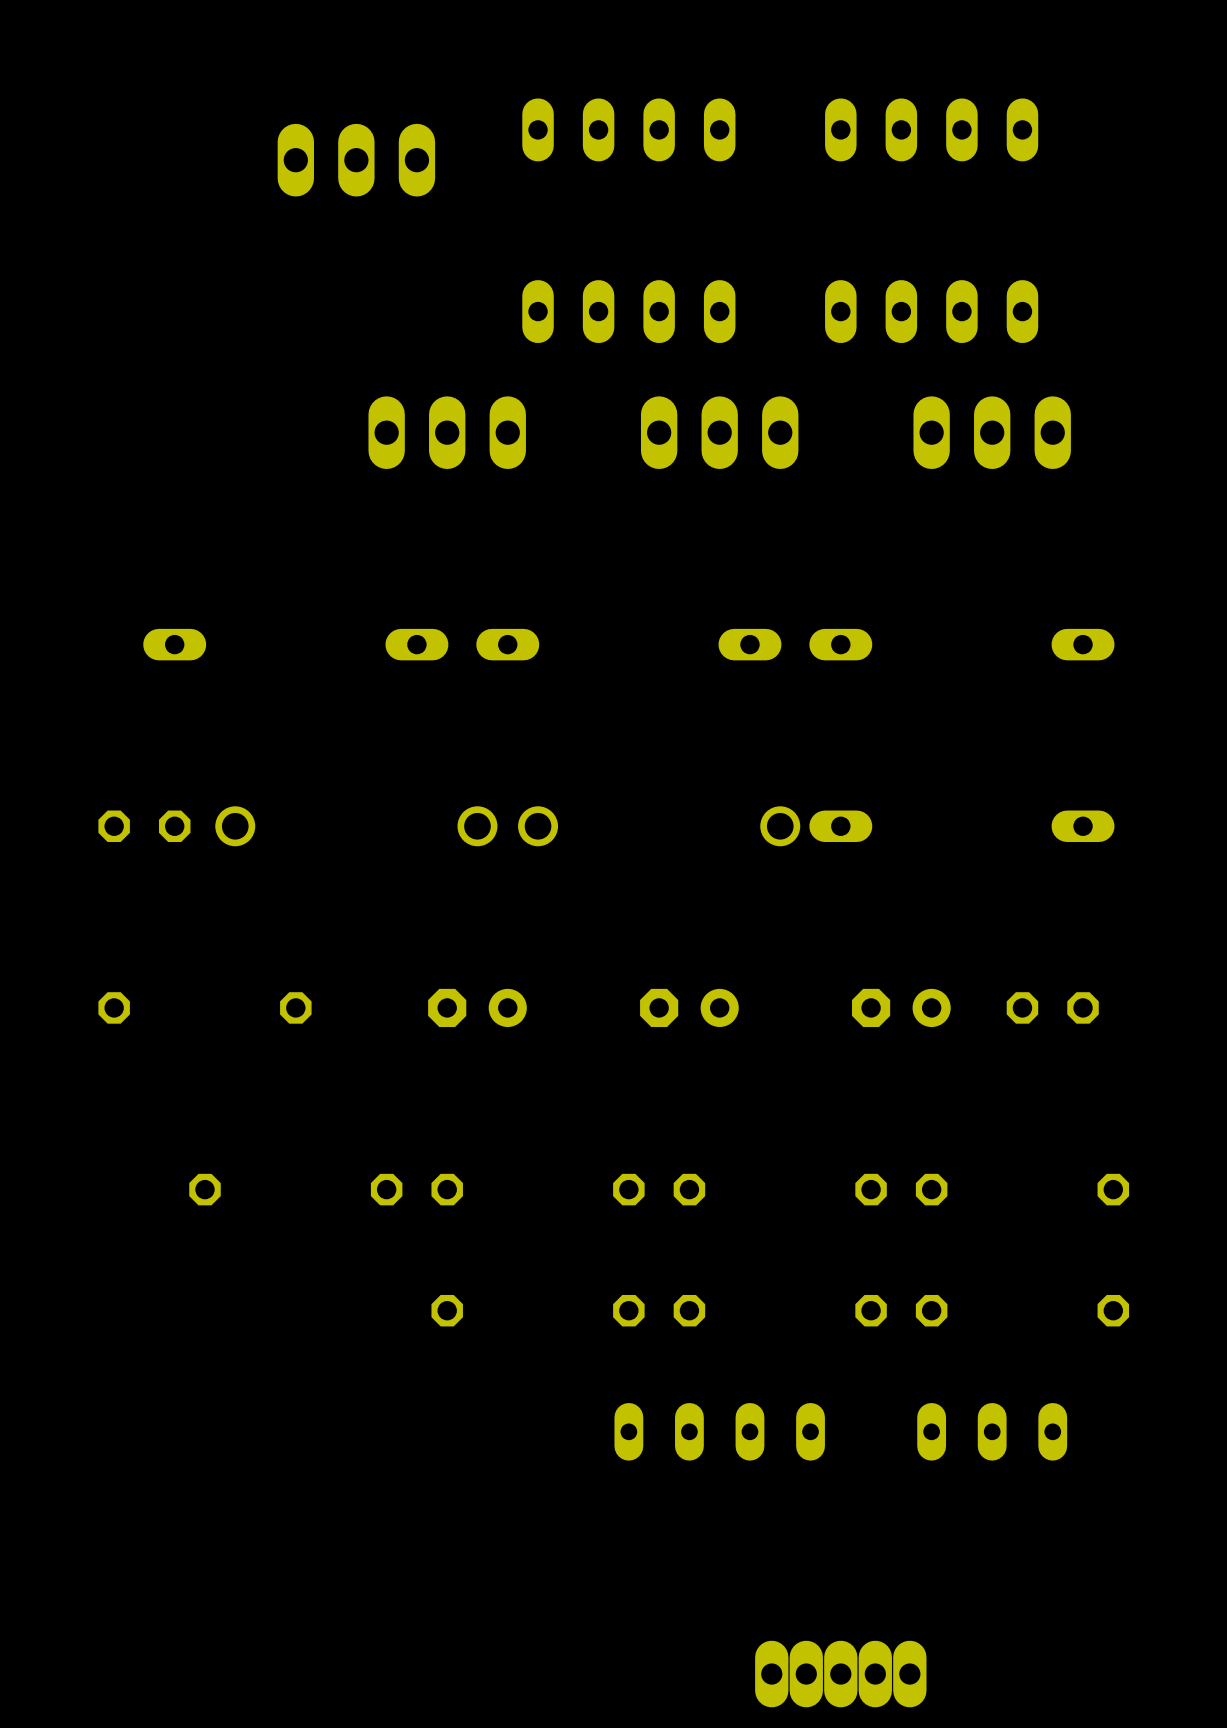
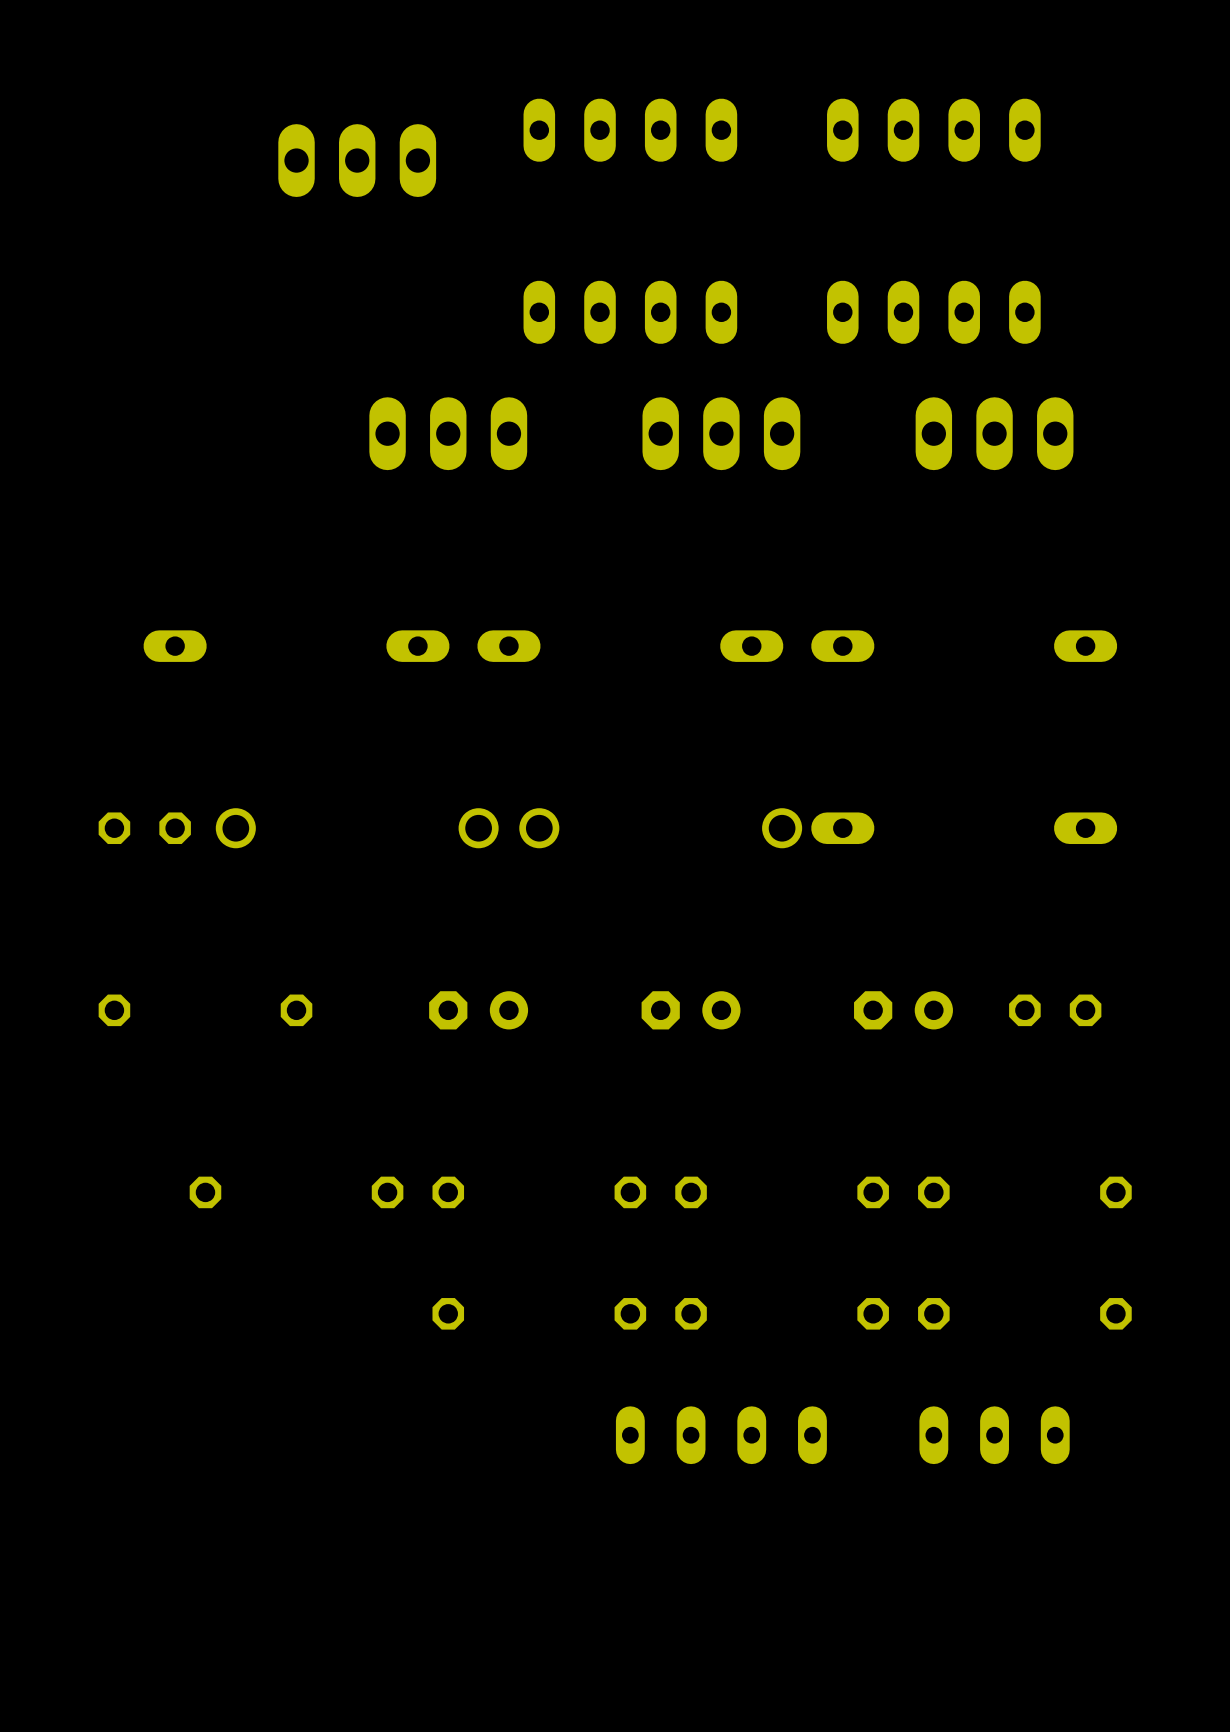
part: (840, 1674) -> none

